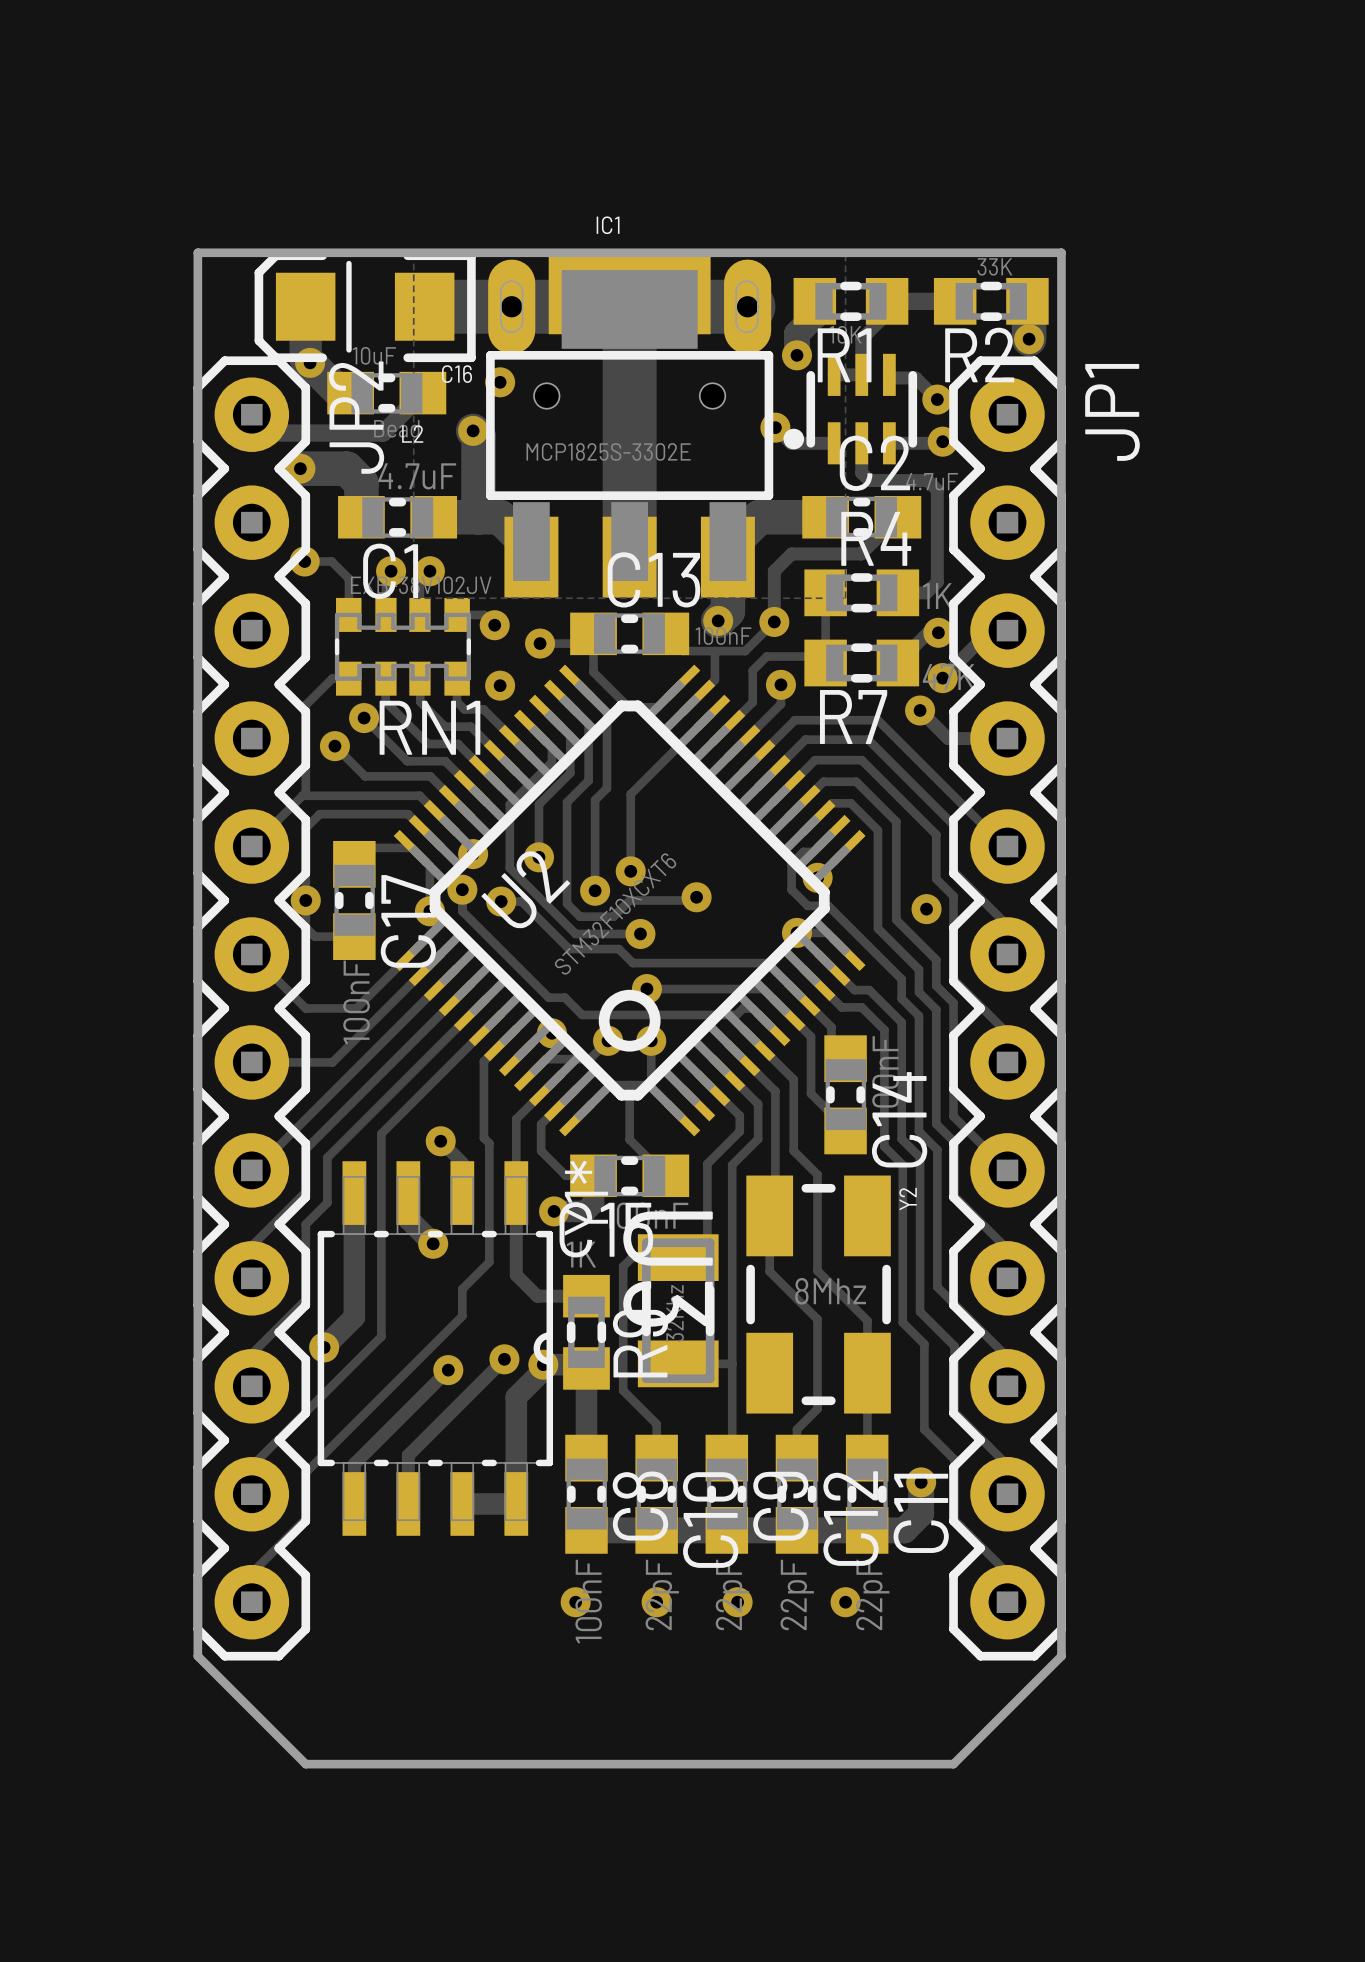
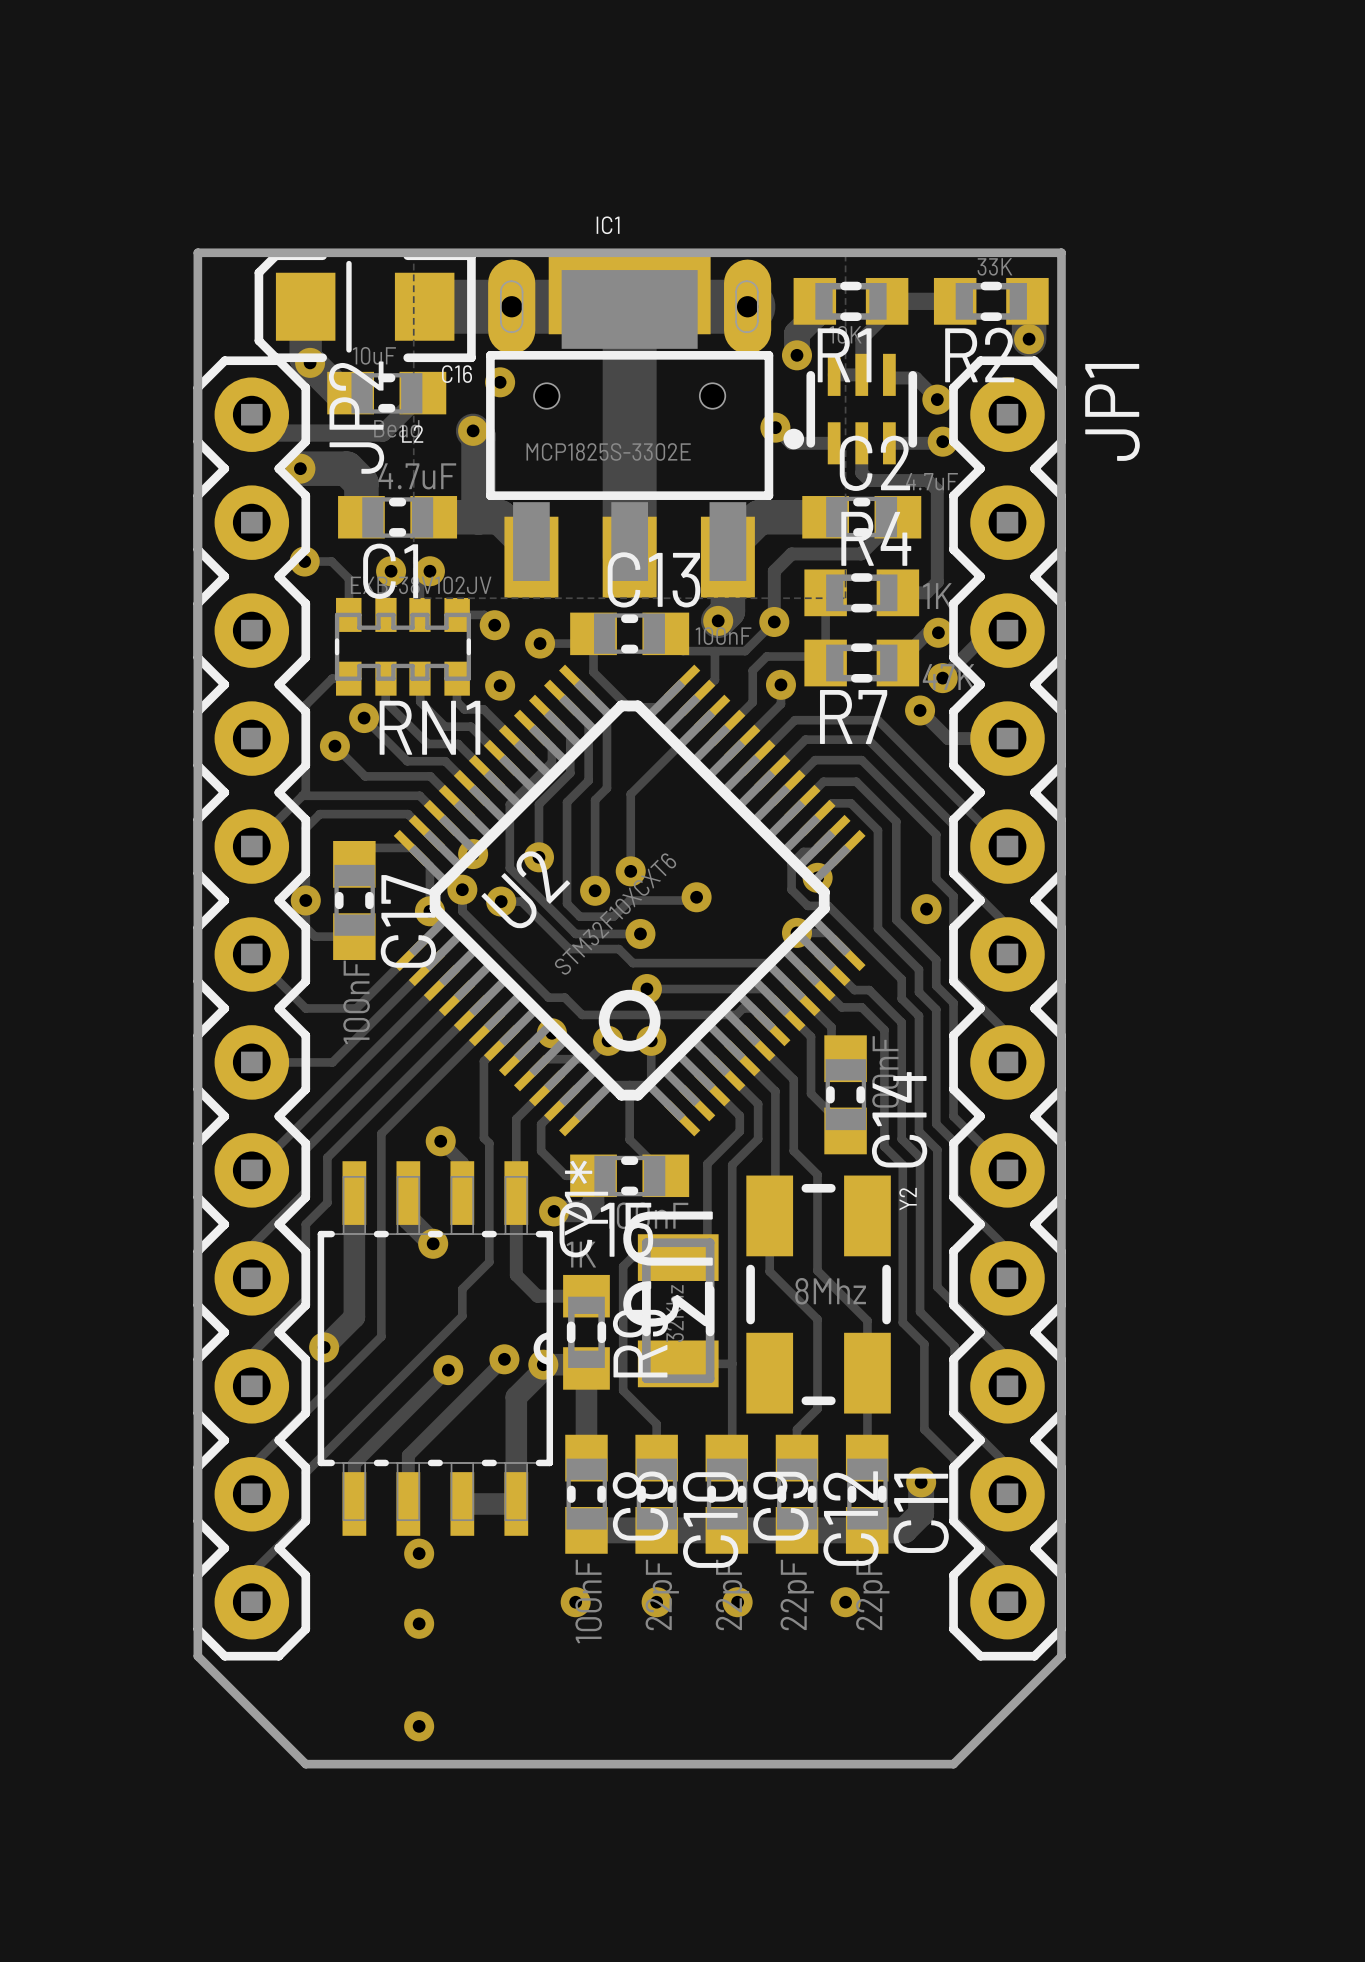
via: none -> (419, 1553)
via: none -> (419, 1623)
via: none -> (419, 1726)

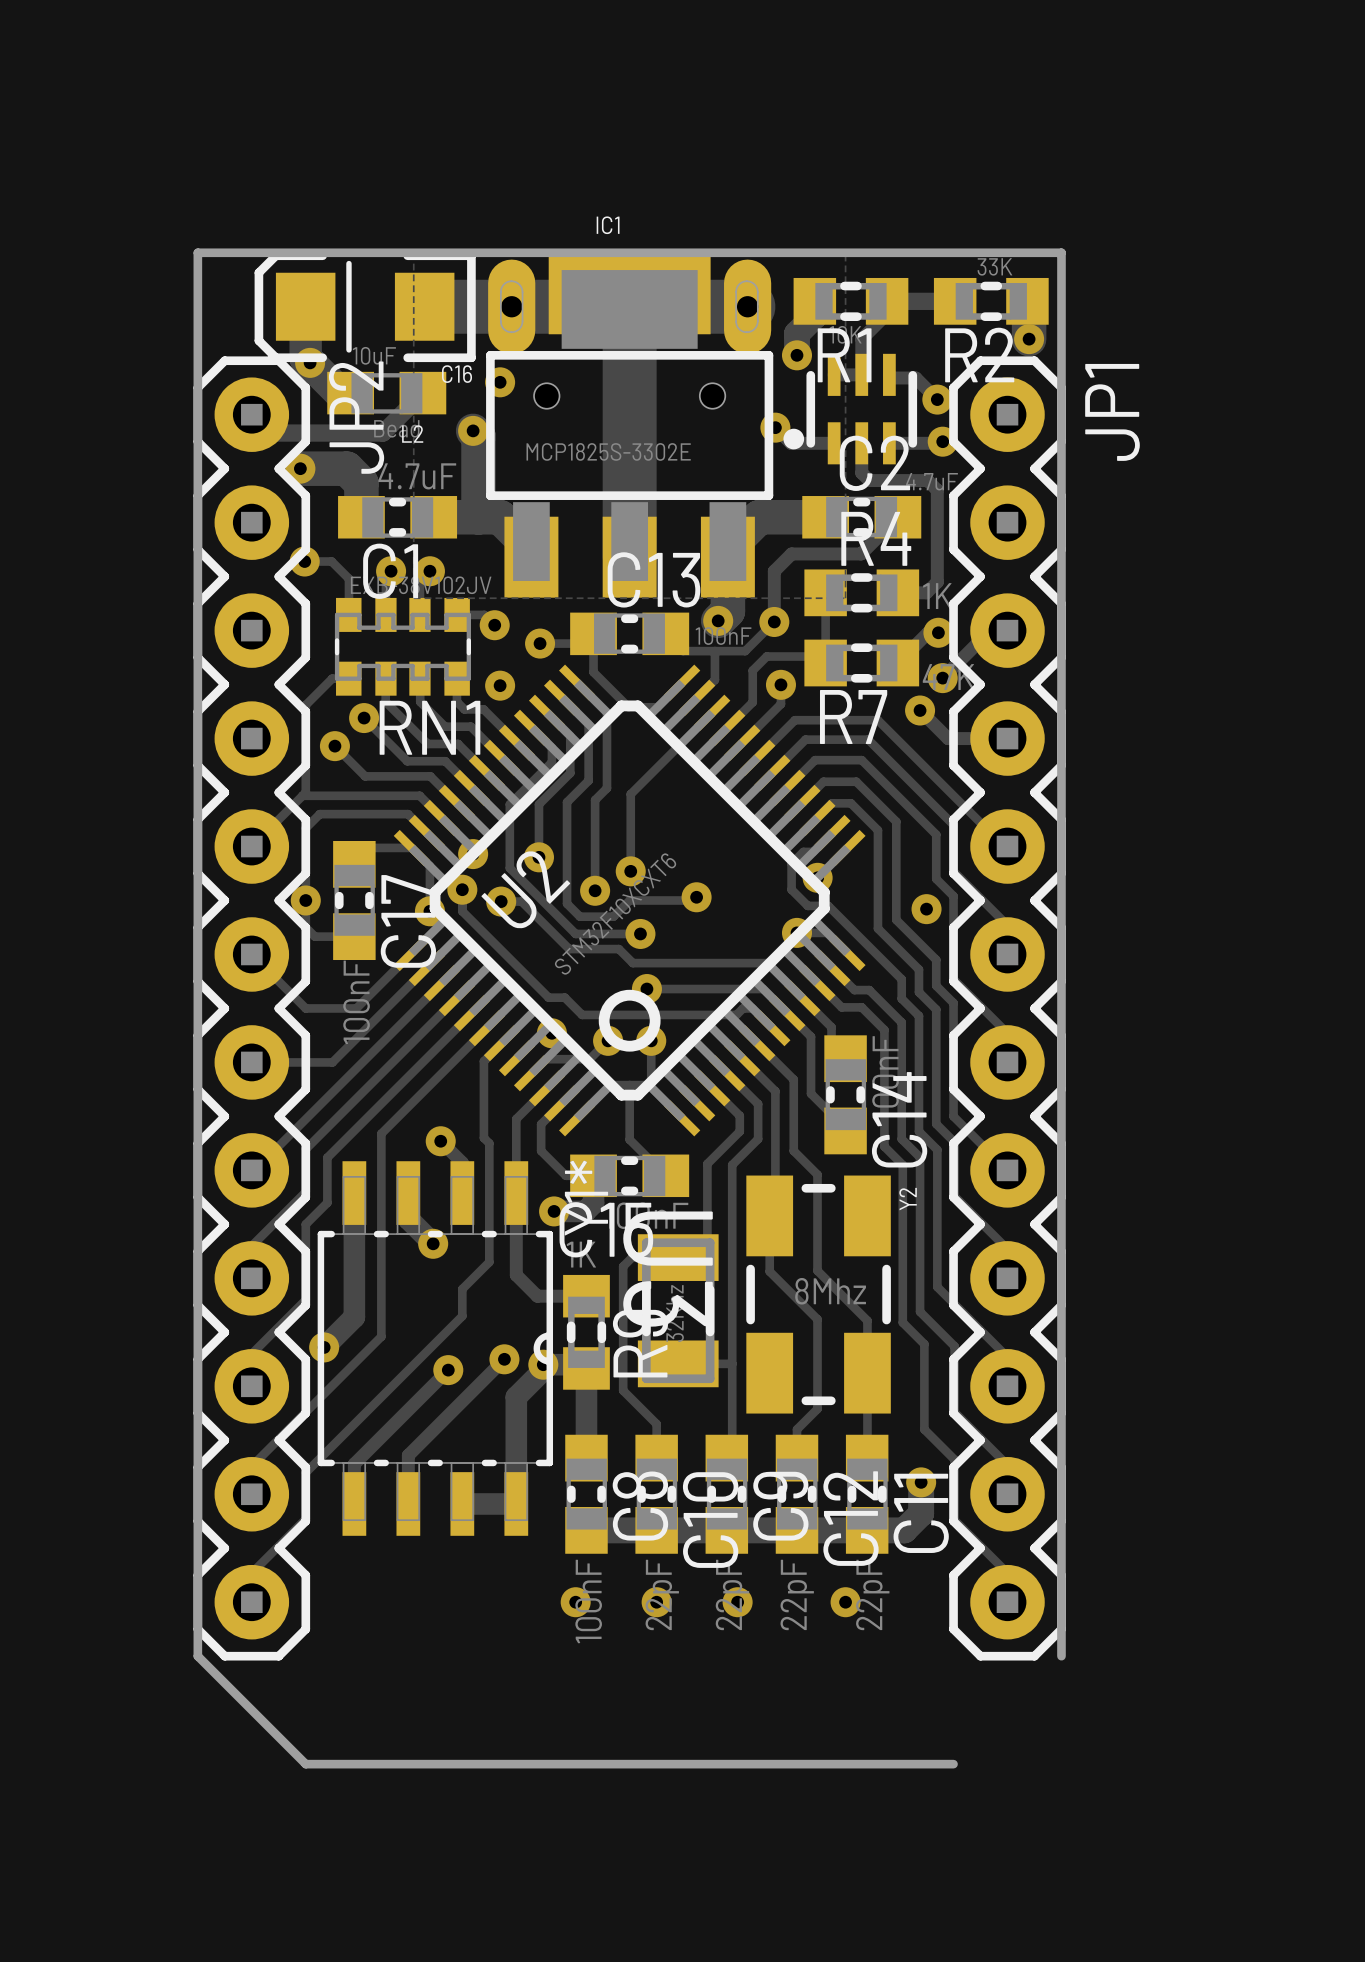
L2 footprint: [327, 371, 447, 415] -> [327, 371, 447, 415]
via: (419, 1553) -> none
via: (419, 1623) -> none
board edge: (1061, 1656) (953, 1764) -> none
via: (419, 1726) -> none

